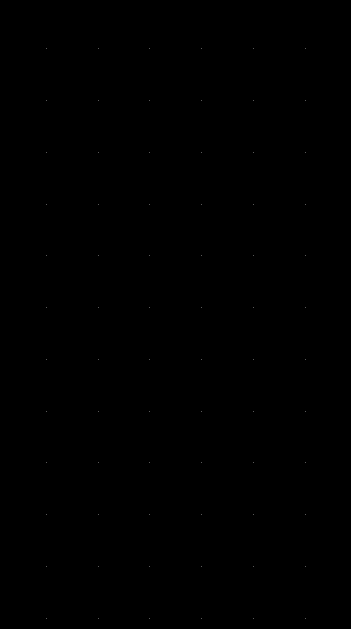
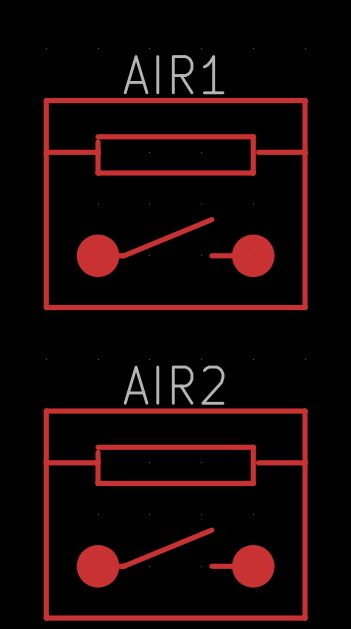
AIR1: none -> (175, 204)
AIR2: none -> (175, 514)

